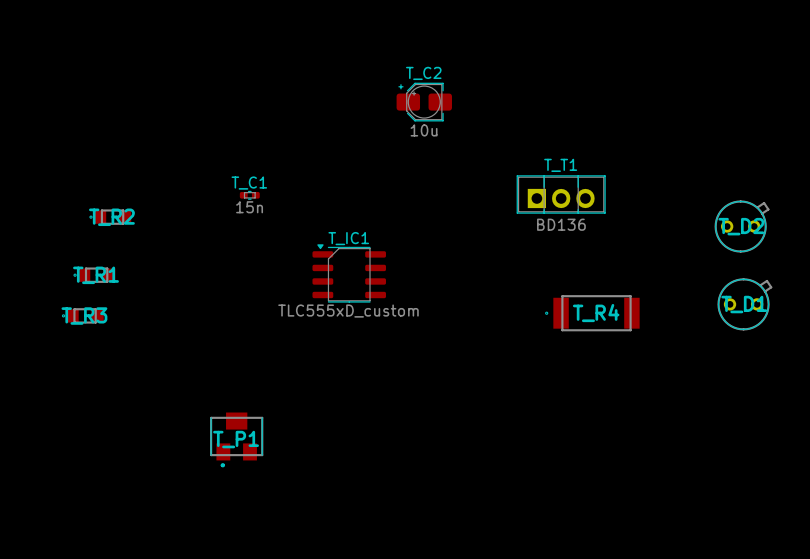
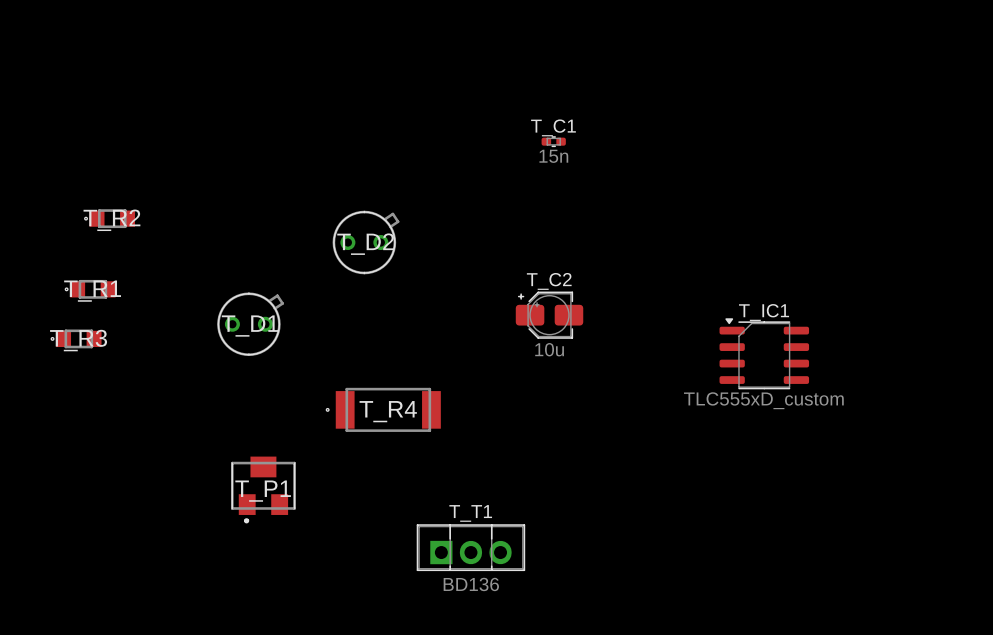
T_C2 position: (424, 102) -> (549, 315)
T_T1 position: (561, 194) -> (470, 547)
T_C1 position: (249, 195) -> (553, 141)
T_D2 position: (742, 226) -> (365, 242)
T_IC1 position: (349, 273) -> (764, 353)
T_D1 position: (744, 304) -> (250, 324)
T_R4 position: (592, 313) -> (383, 409)

